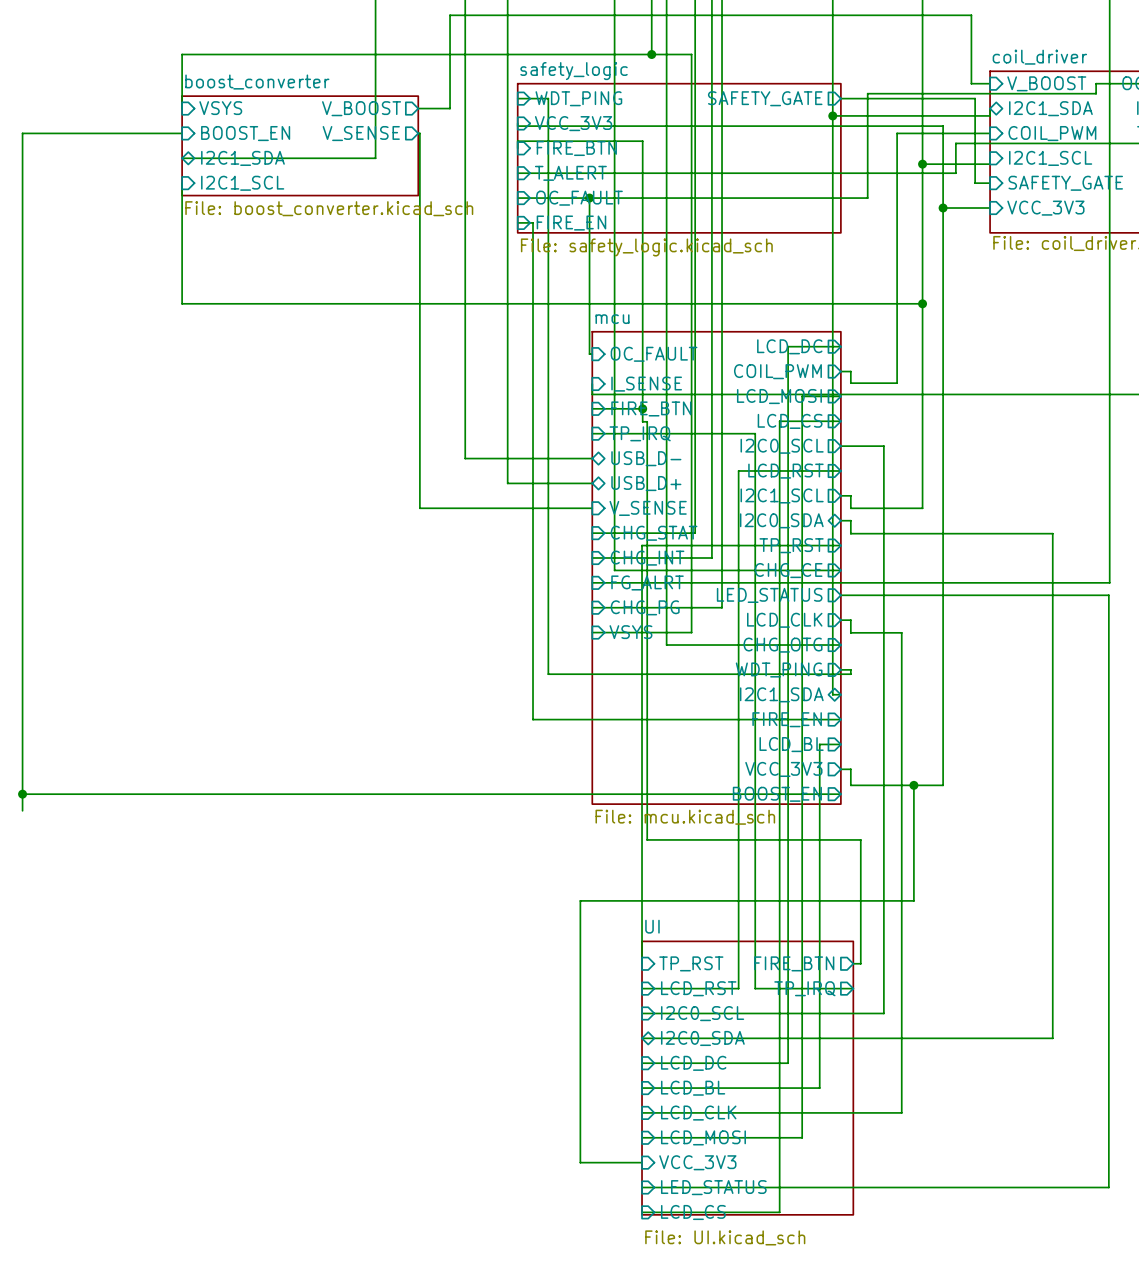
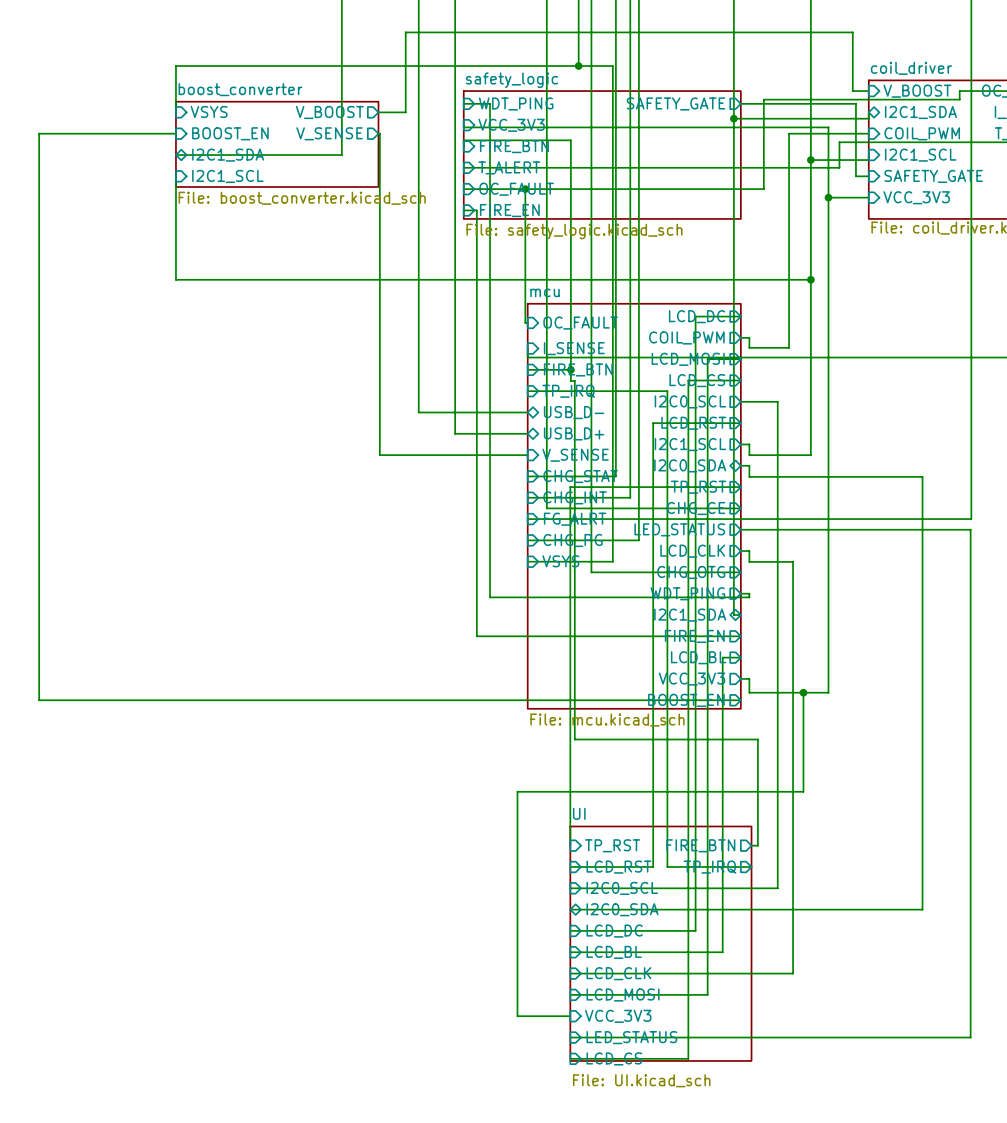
wire: (22, 794) (22, 810) -> none
junction: (22, 794) -> none

